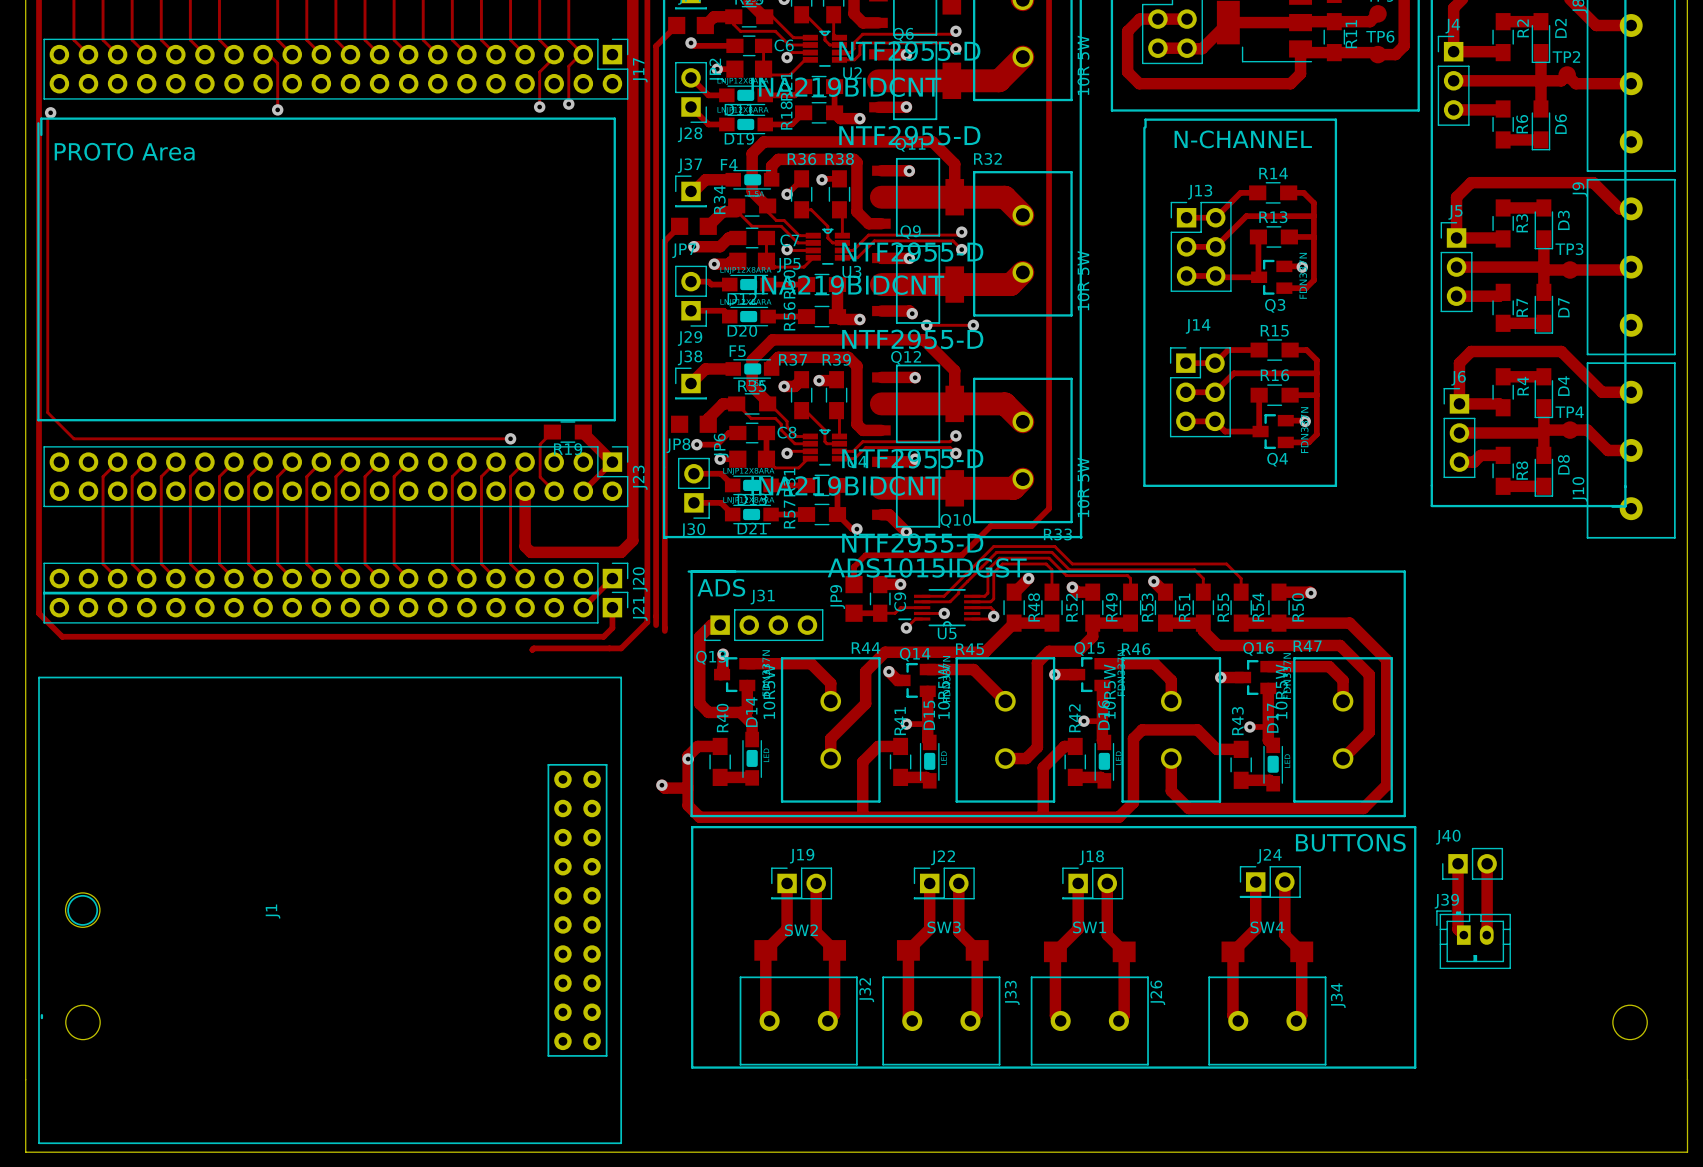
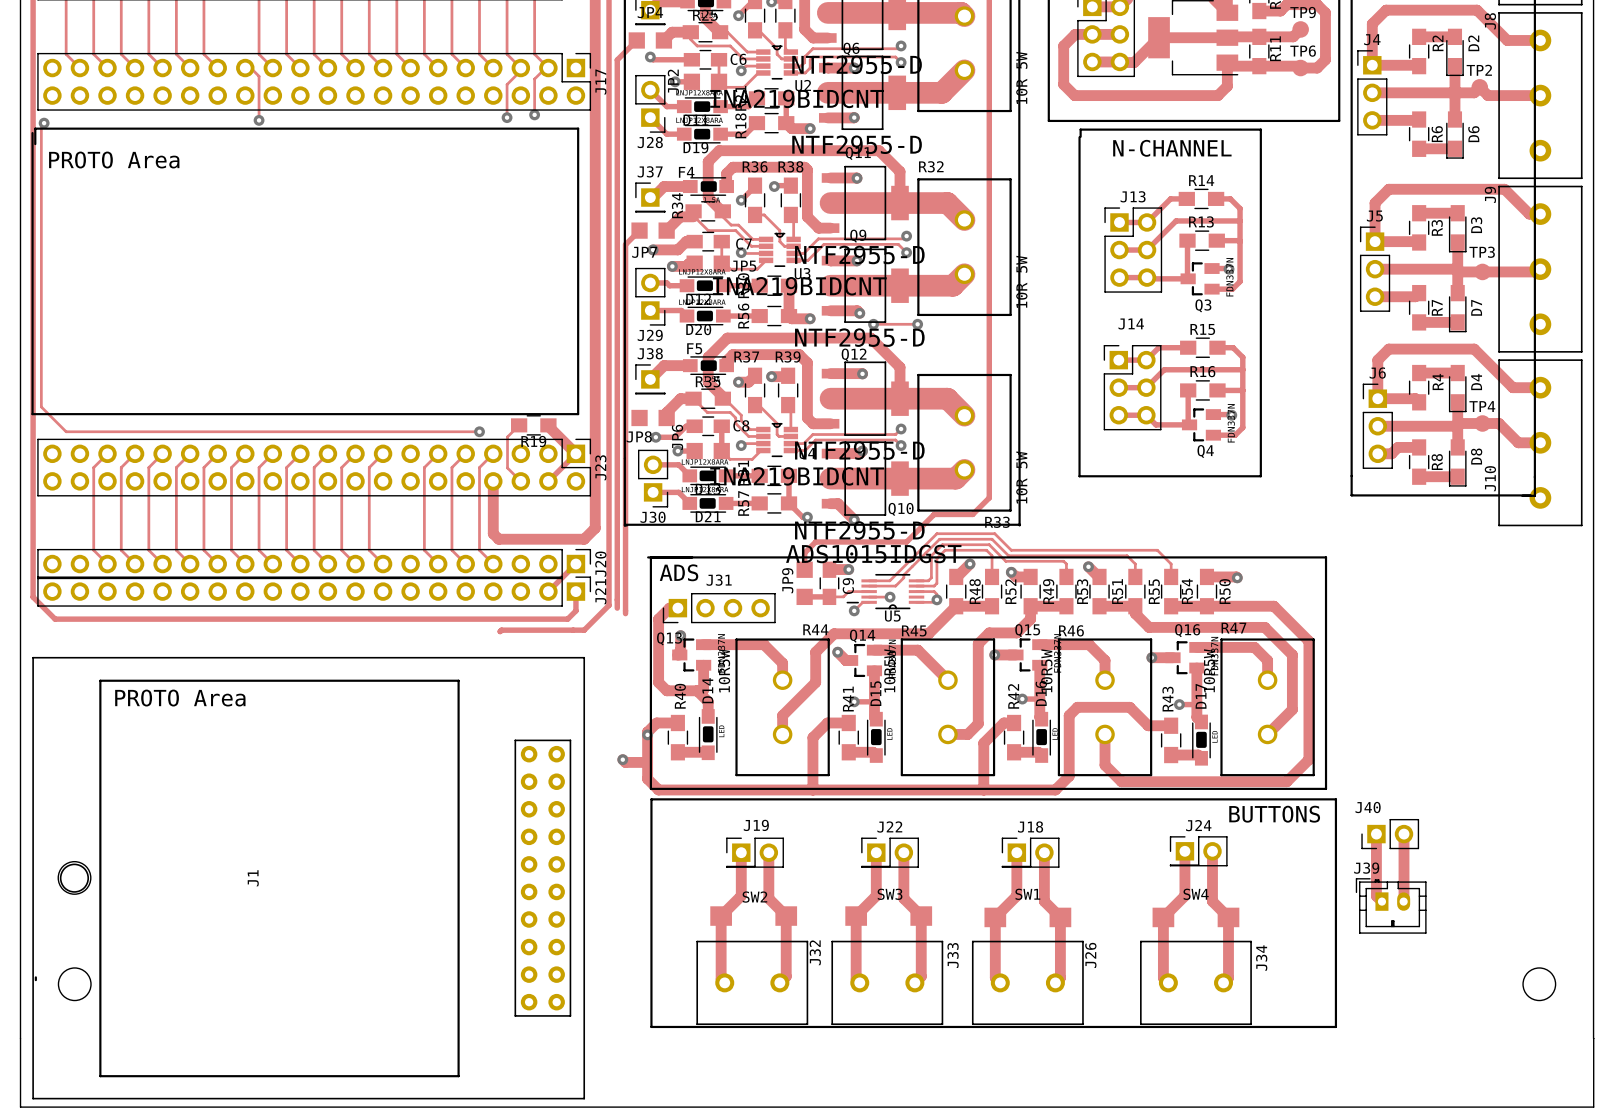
line: none -> (100, 680) (458, 680) (458, 1076) (100, 1076) (100, 680)
text: none -> PROTO Area (180, 698)

